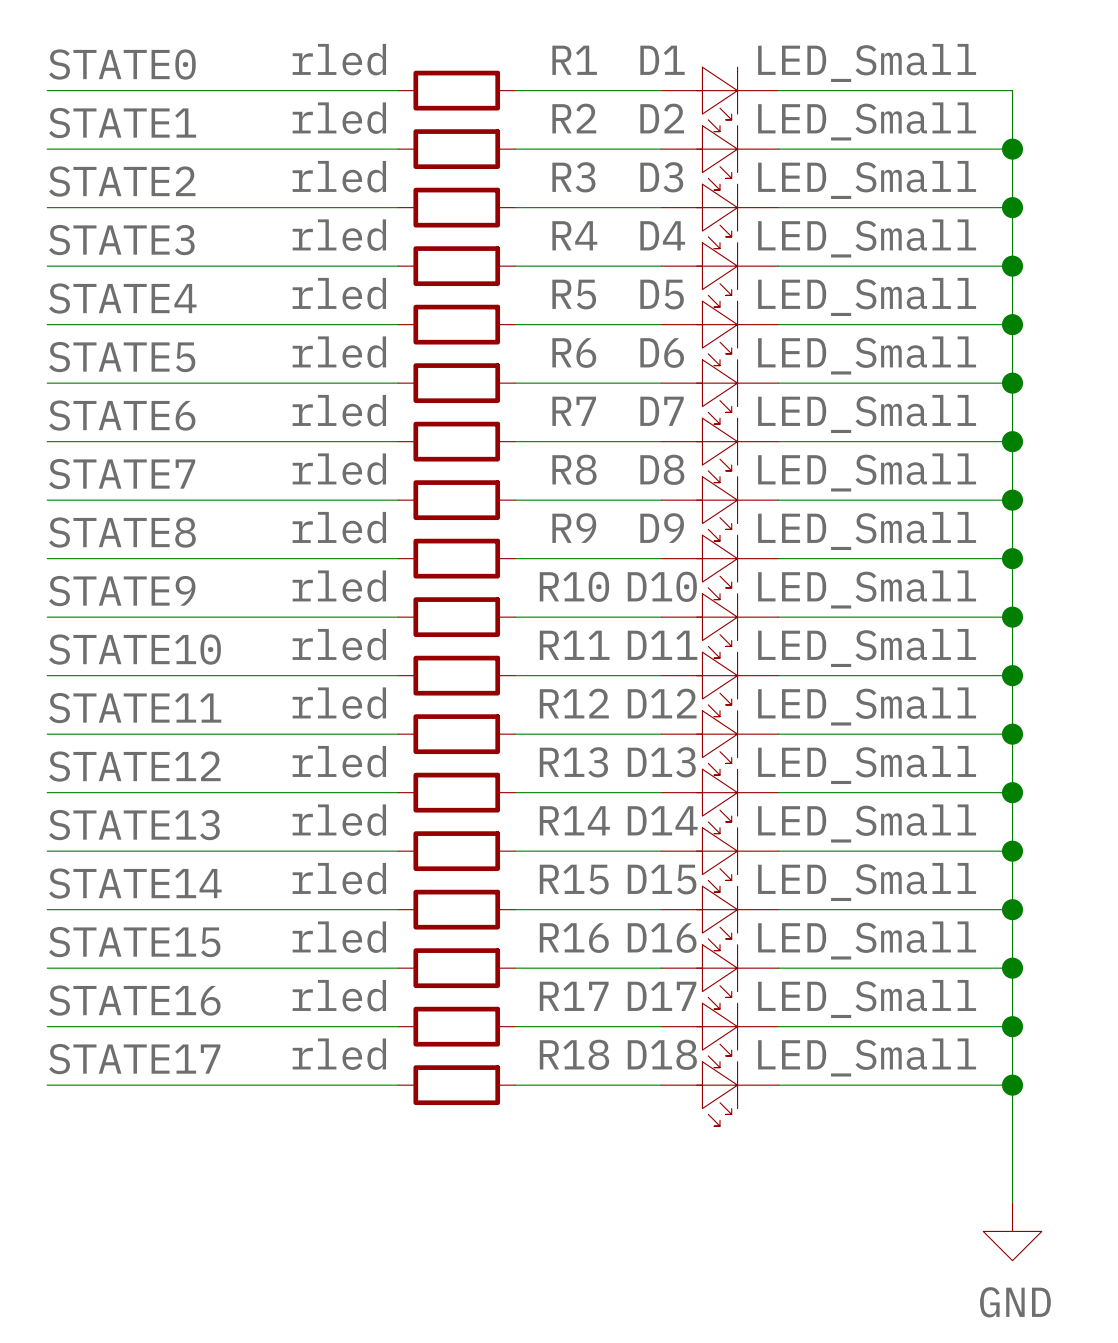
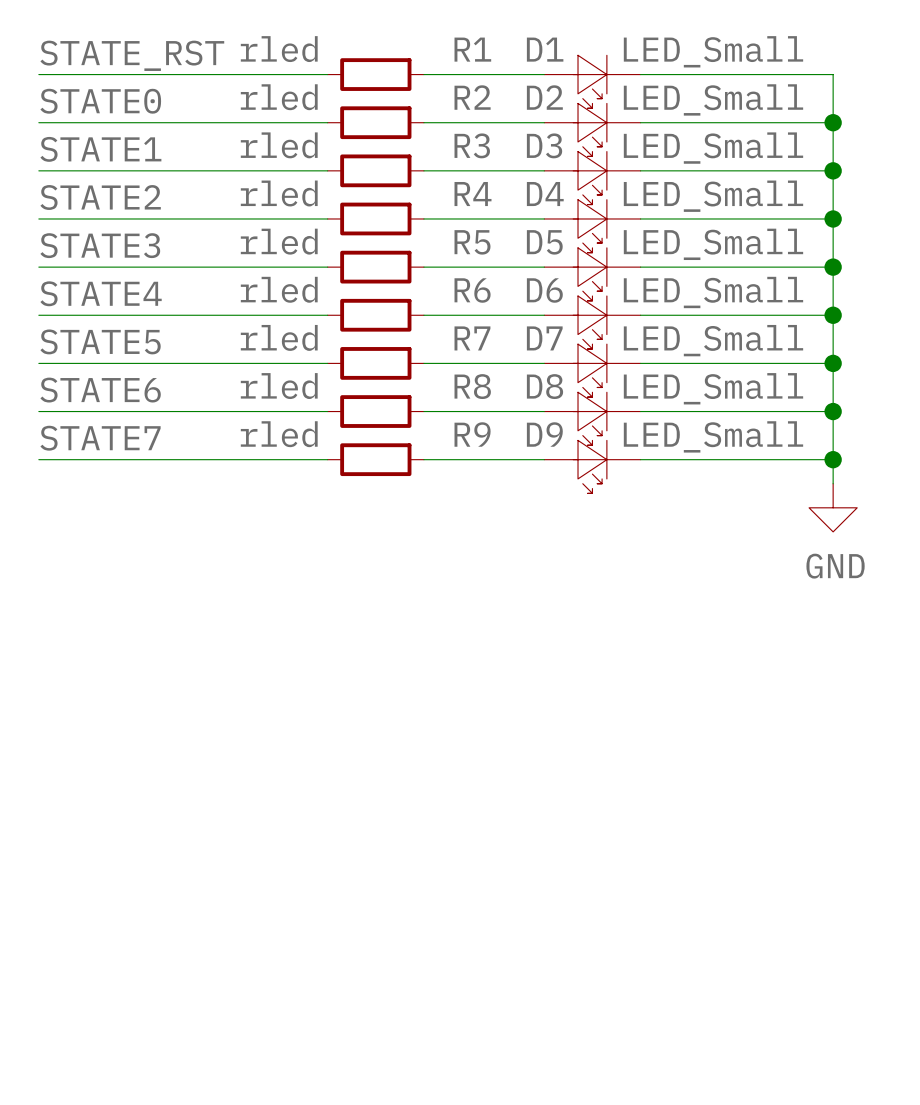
label: STATE0 (122, 64) -> STATE_RST (132, 55)
label: STATE1 (122, 123) -> STATE0 (100, 101)
label: STATE2 (122, 181) -> STATE1 (100, 149)
label: STATE3 (121, 240) -> STATE2 (100, 197)
label: STATE4 (122, 298) -> STATE3 (100, 245)
label: STATE5 (122, 357) -> STATE4 (101, 293)
label: STATE6 (122, 415) -> STATE5 (100, 341)
label: STATE7 (122, 474) -> STATE6 (100, 390)
label: STATE8 (122, 532) -> STATE7 (100, 438)
wire: (1012, 587) (1012, 1202) -> none
label: STATE9 (122, 591) -> none
wire: (47, 617) (398, 617) -> none
R10: rled (456, 617) -> none
wire: (515, 617) (661, 617) -> none
wire: (778, 617) (1012, 617) -> none
junction: (1012, 617) -> none
power symbol: none -> GND (833, 507)
D10: LED_Small (720, 625) -> none
label: STATE10 (135, 649) -> none
wire: (47, 675) (398, 675) -> none
R11: rled (456, 675) -> none
wire: (515, 675) (661, 675) -> none
wire: (778, 675) (1012, 675) -> none
junction: (1012, 675) -> none
D11: LED_Small (720, 684) -> none
label: STATE11 (135, 708) -> none
wire: (47, 734) (398, 734) -> none
R12: rled (456, 734) -> none
wire: (515, 734) (661, 734) -> none
wire: (778, 734) (1012, 734) -> none
junction: (1012, 734) -> none
D12: LED_Small (720, 742) -> none
label: STATE12 (134, 766) -> none
wire: (47, 792) (398, 792) -> none
R13: rled (456, 792) -> none
wire: (515, 792) (661, 792) -> none
wire: (778, 792) (1012, 792) -> none
junction: (1012, 792) -> none
D13: LED_Small (720, 801) -> none
label: STATE13 (134, 825) -> none
wire: (47, 851) (398, 851) -> none
R14: rled (456, 851) -> none
wire: (515, 851) (661, 851) -> none
wire: (778, 851) (1012, 851) -> none
junction: (1012, 851) -> none
D14: LED_Small (720, 859) -> none
label: STATE14 (135, 883) -> none
wire: (47, 909) (398, 909) -> none
R15: rled (456, 909) -> none
wire: (515, 909) (661, 909) -> none
wire: (778, 909) (1012, 909) -> none
junction: (1012, 909) -> none
D15: LED_Small (720, 918) -> none
label: STATE15 (134, 942) -> none
wire: (47, 968) (398, 968) -> none
R16: rled (456, 968) -> none
wire: (515, 968) (661, 968) -> none
wire: (778, 968) (1012, 968) -> none
junction: (1012, 968) -> none
D16: LED_Small (720, 976) -> none
label: STATE16 (134, 1000) -> none
wire: (47, 1026) (398, 1026) -> none
R17: rled (456, 1026) -> none
wire: (515, 1026) (661, 1026) -> none
wire: (778, 1026) (1012, 1026) -> none
junction: (1012, 1026) -> none
D17: LED_Small (720, 1035) -> none
label: STATE17 (134, 1059) -> none
wire: (47, 1085) (398, 1085) -> none
R18: rled (456, 1085) -> none
wire: (515, 1085) (661, 1085) -> none
wire: (778, 1085) (1012, 1085) -> none
junction: (1012, 1085) -> none
D18: LED_Small (720, 1093) -> none
power symbol: GND (1012, 1231) -> none

